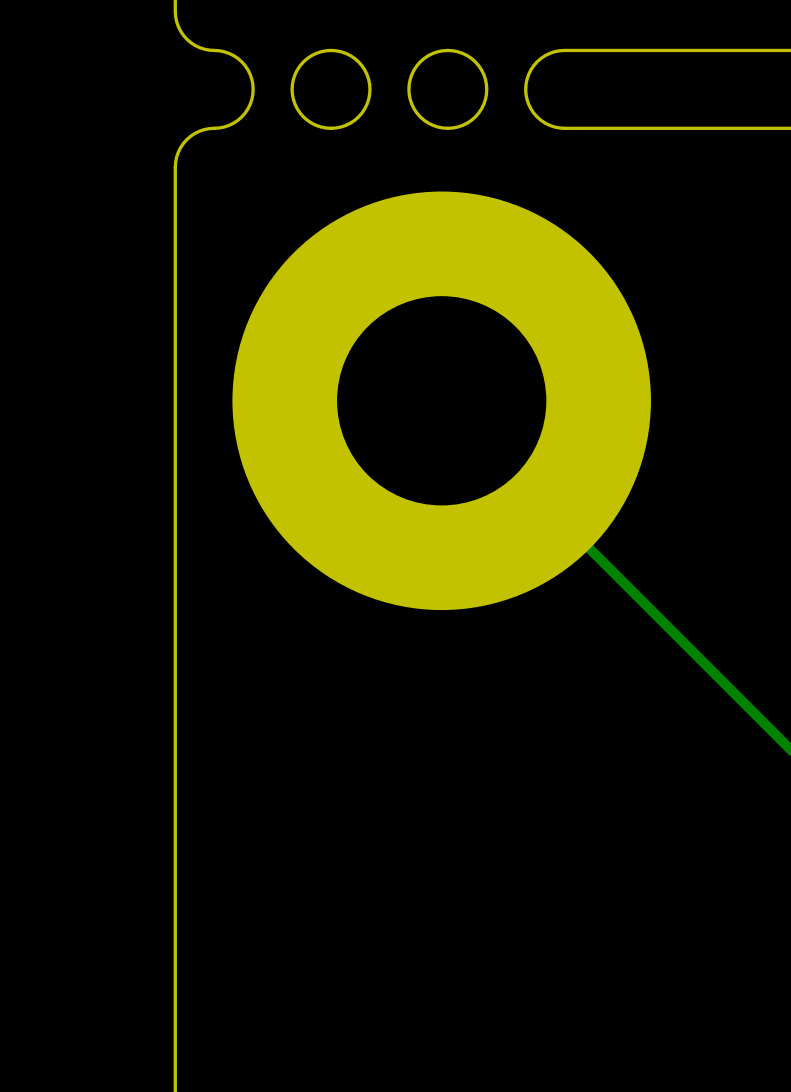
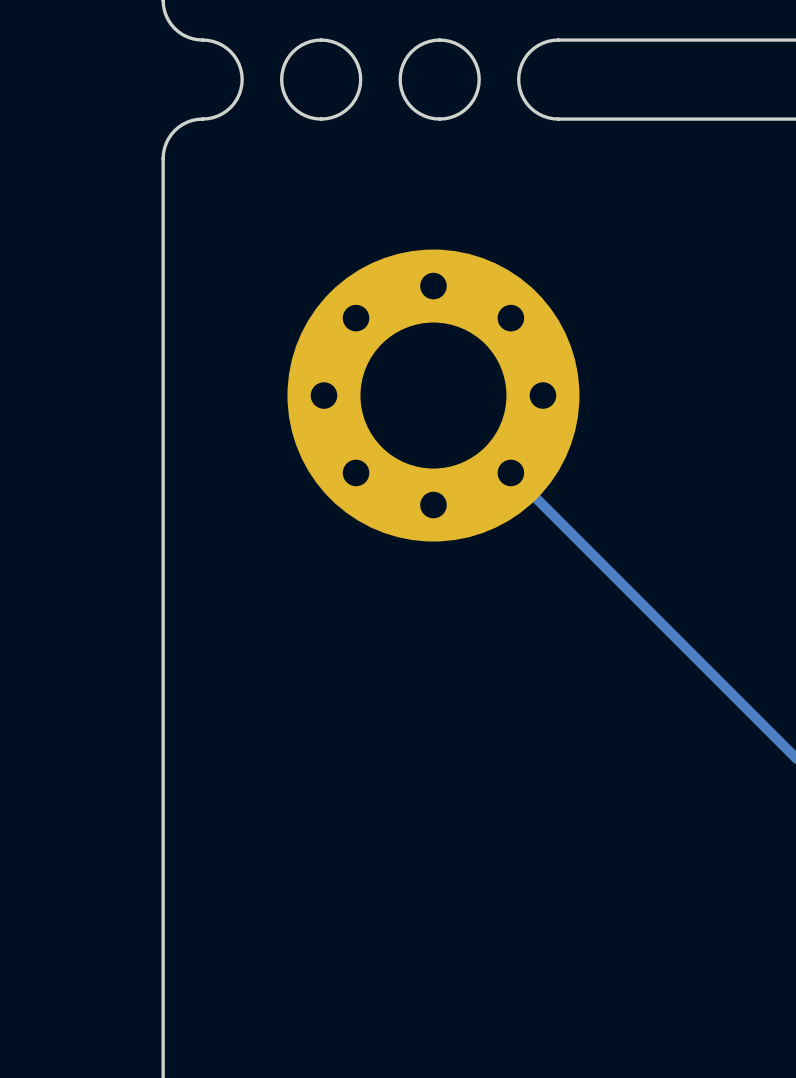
part footprint: [232, 191, 651, 611] -> [287, 249, 580, 542]

